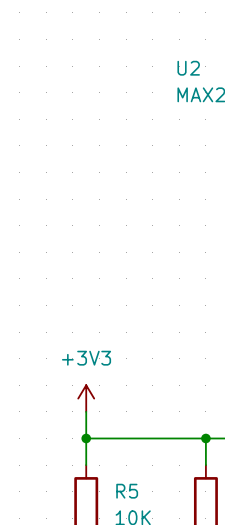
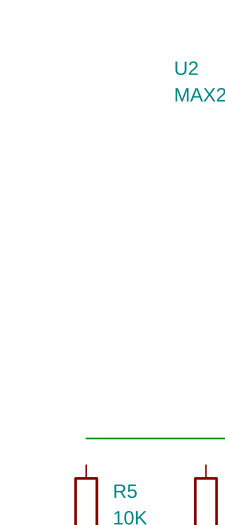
power symbol: +3V3 (86, 398) -> none
wire: (86, 411) (86, 465) -> none
junction: (86, 438) -> none
wire: (205, 438) (205, 465) -> none
junction: (205, 438) -> none

